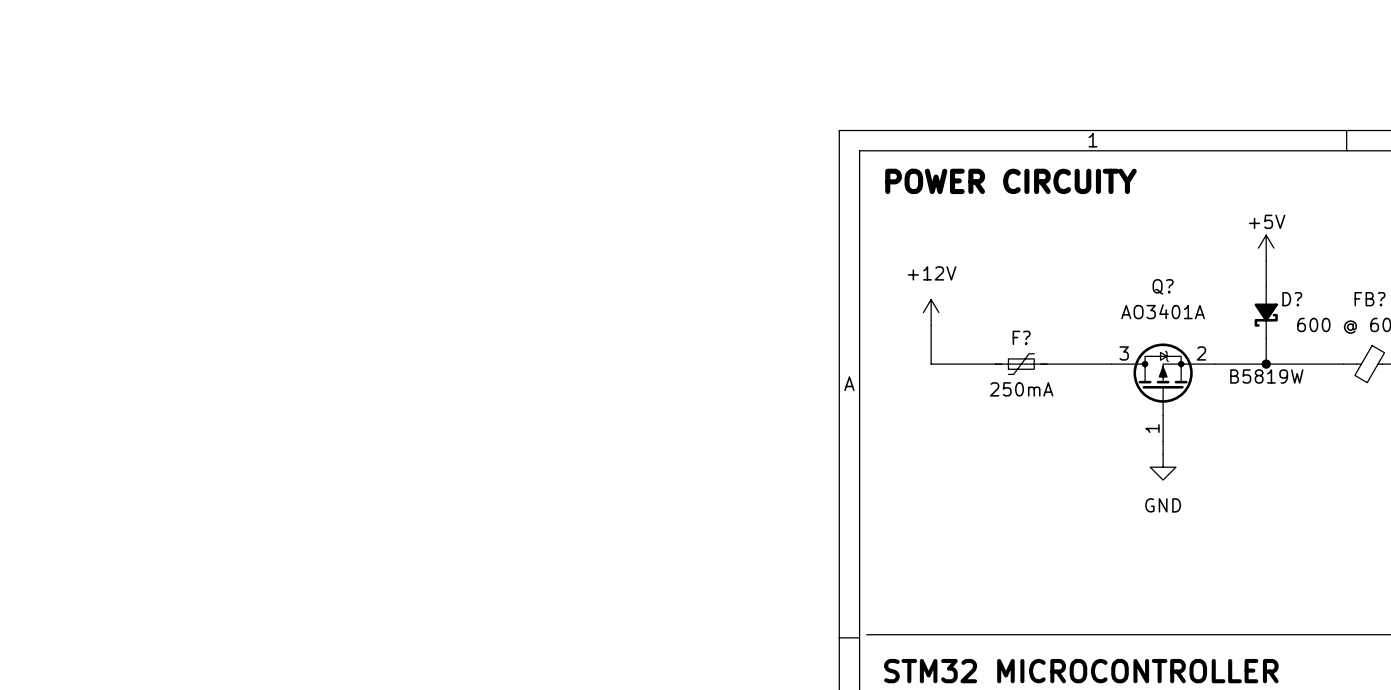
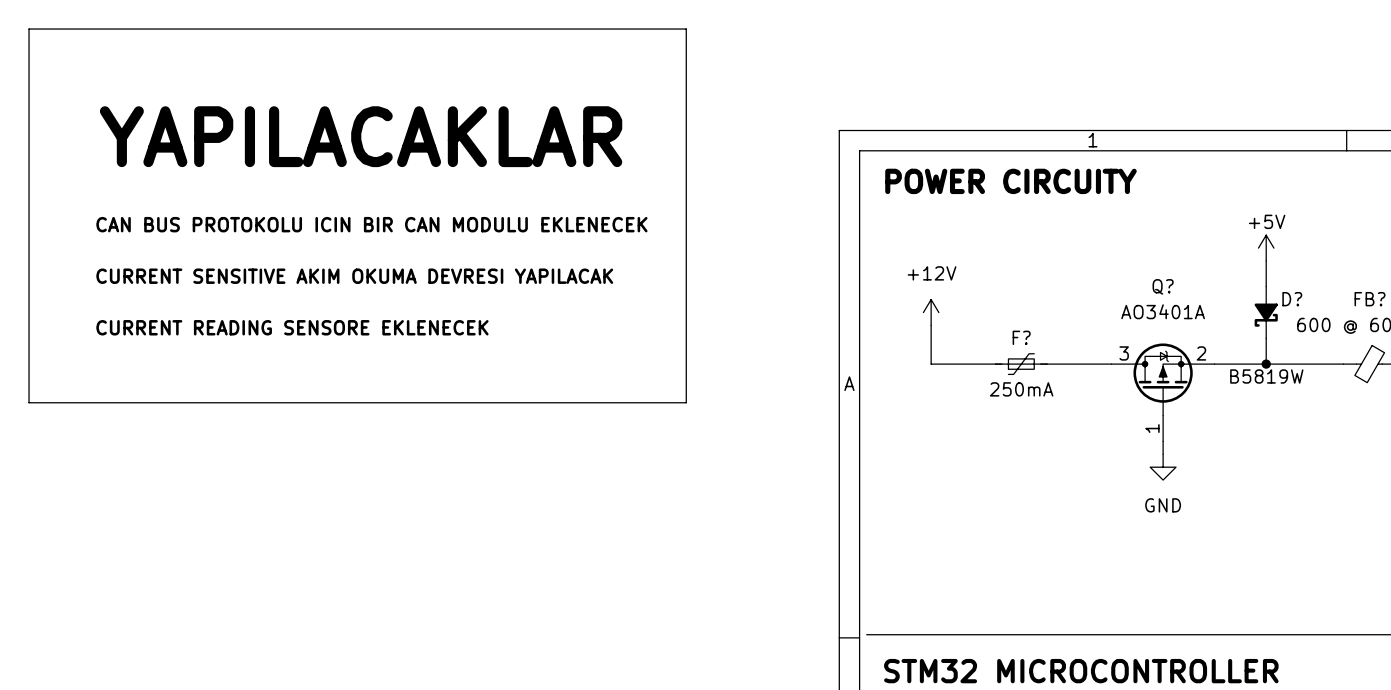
line: none -> (29, 29) (29, 402) (686, 402) (686, 29) (29, 29)
text: none -> YAPILACAKLAR (361, 136)
text: none -> CAN BUS PROTOKOLU ICIN BIR CAN MODULU EKLENECEK (371, 224)
text: none -> CURRENT SENSITIVE AKIM OKUMA DEVRESI YAPILACAK (354, 276)
text: none -> CURRENT READING SENSORE EKLENECEK (292, 327)

